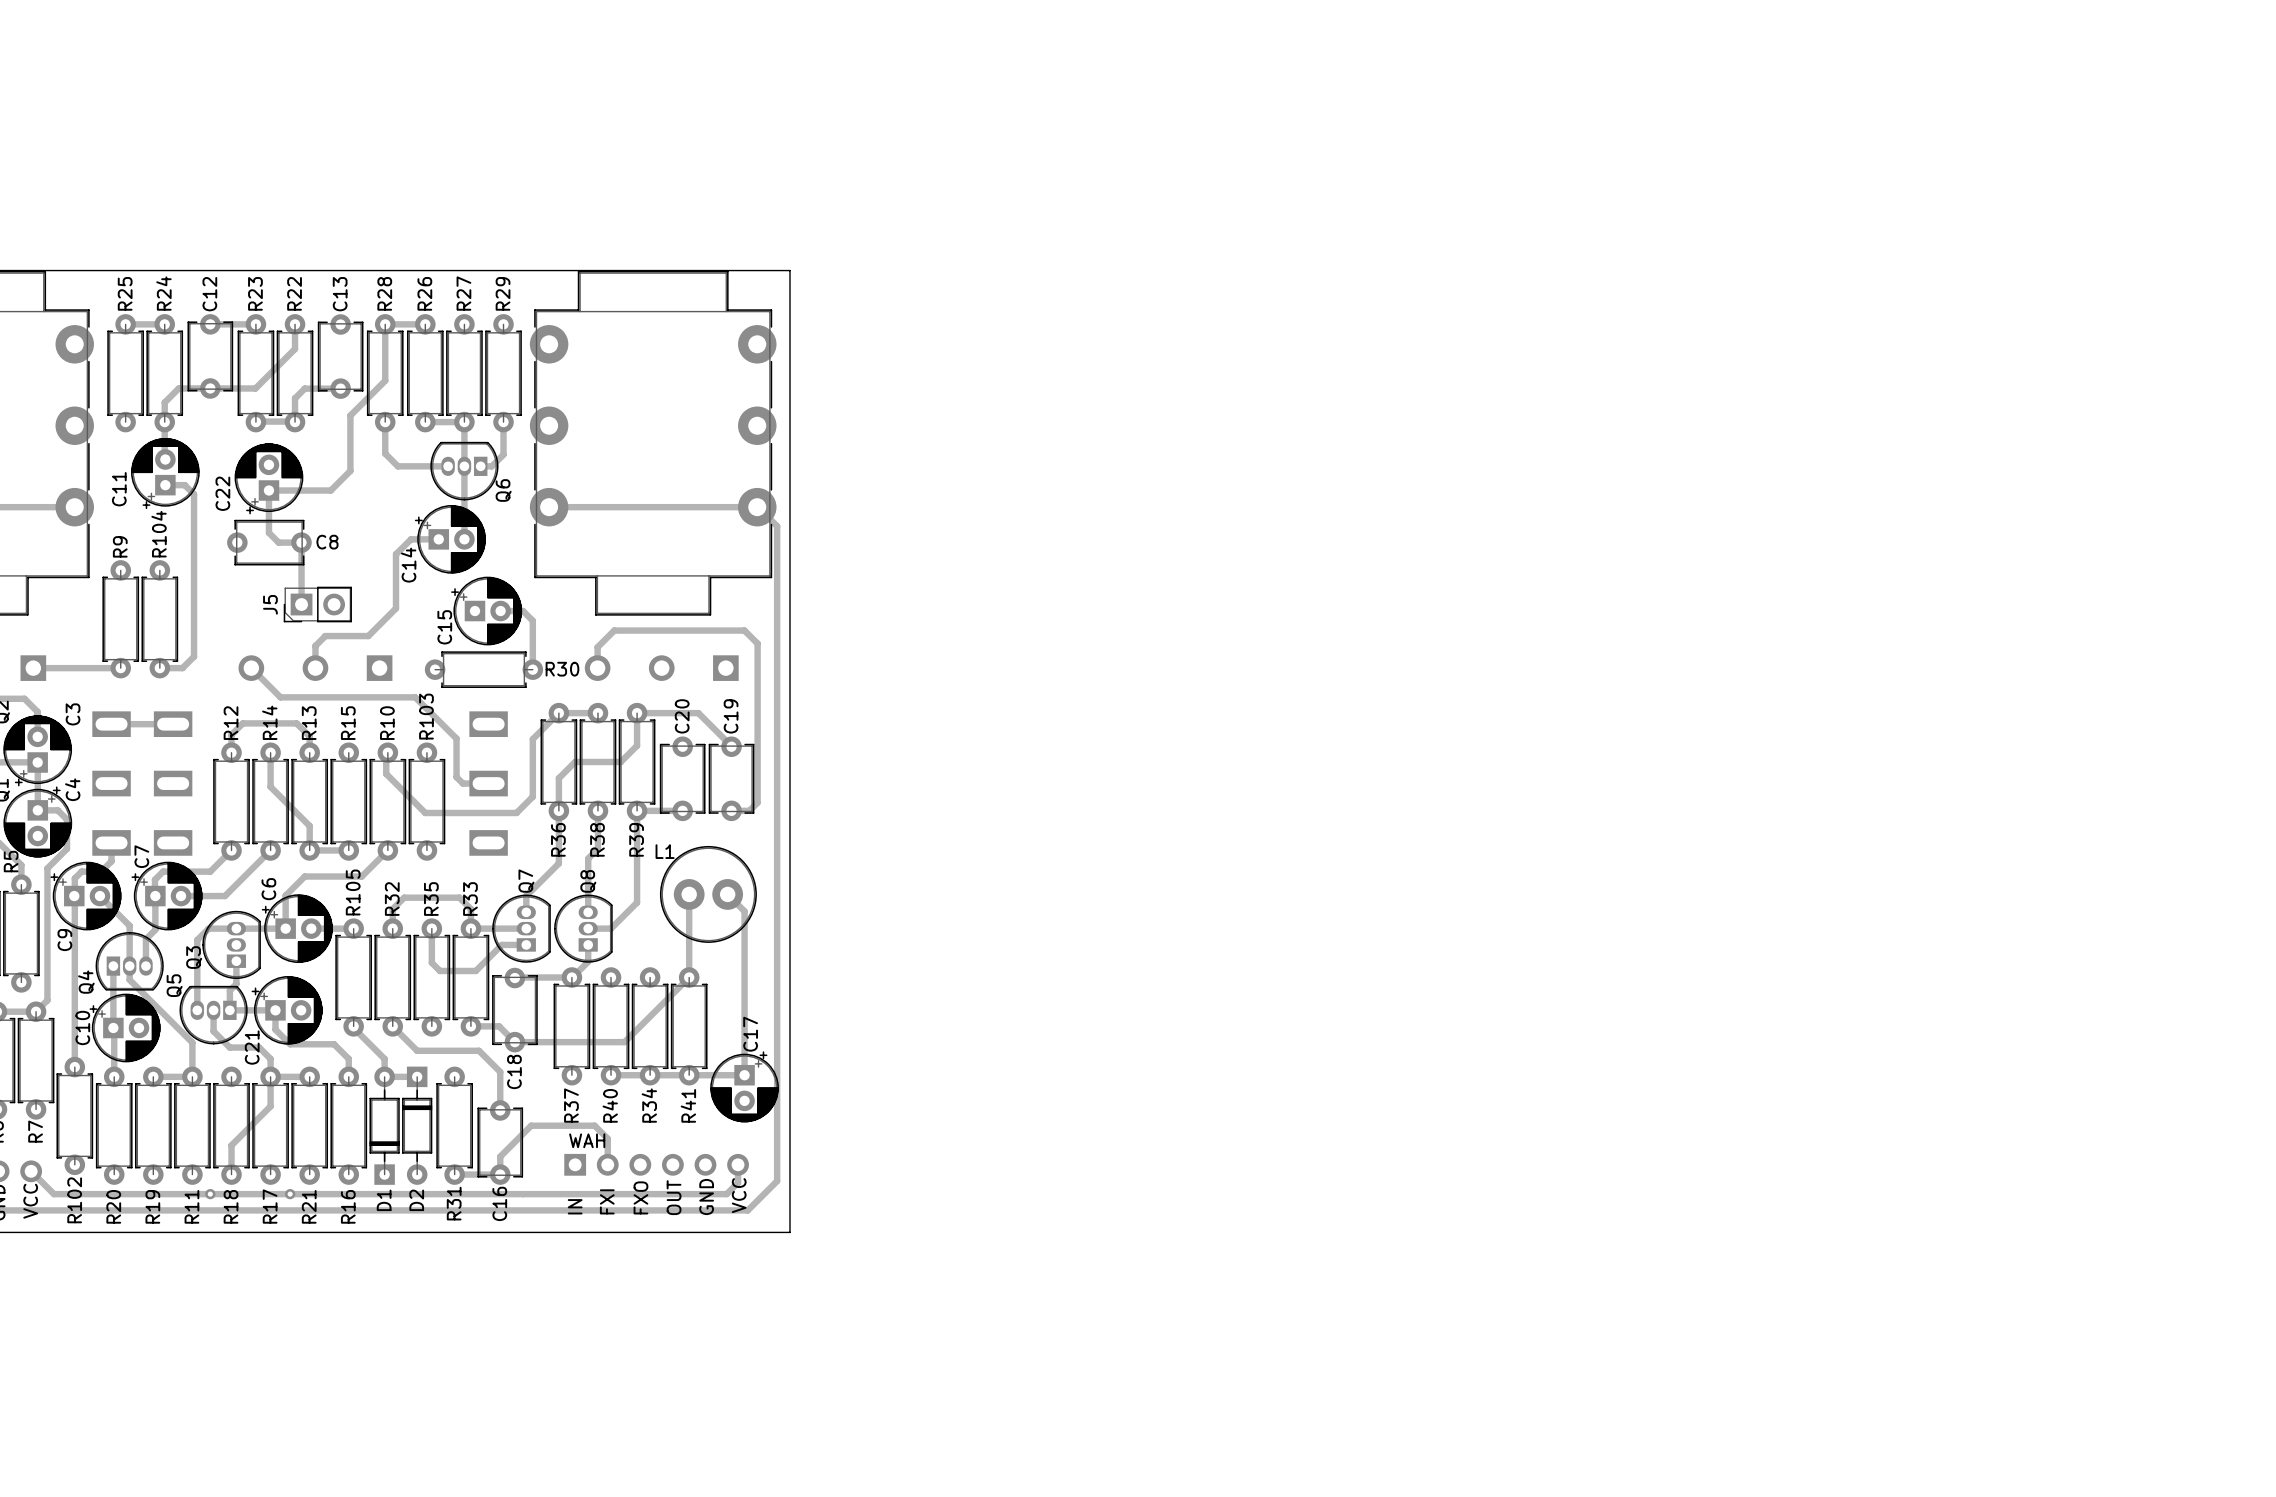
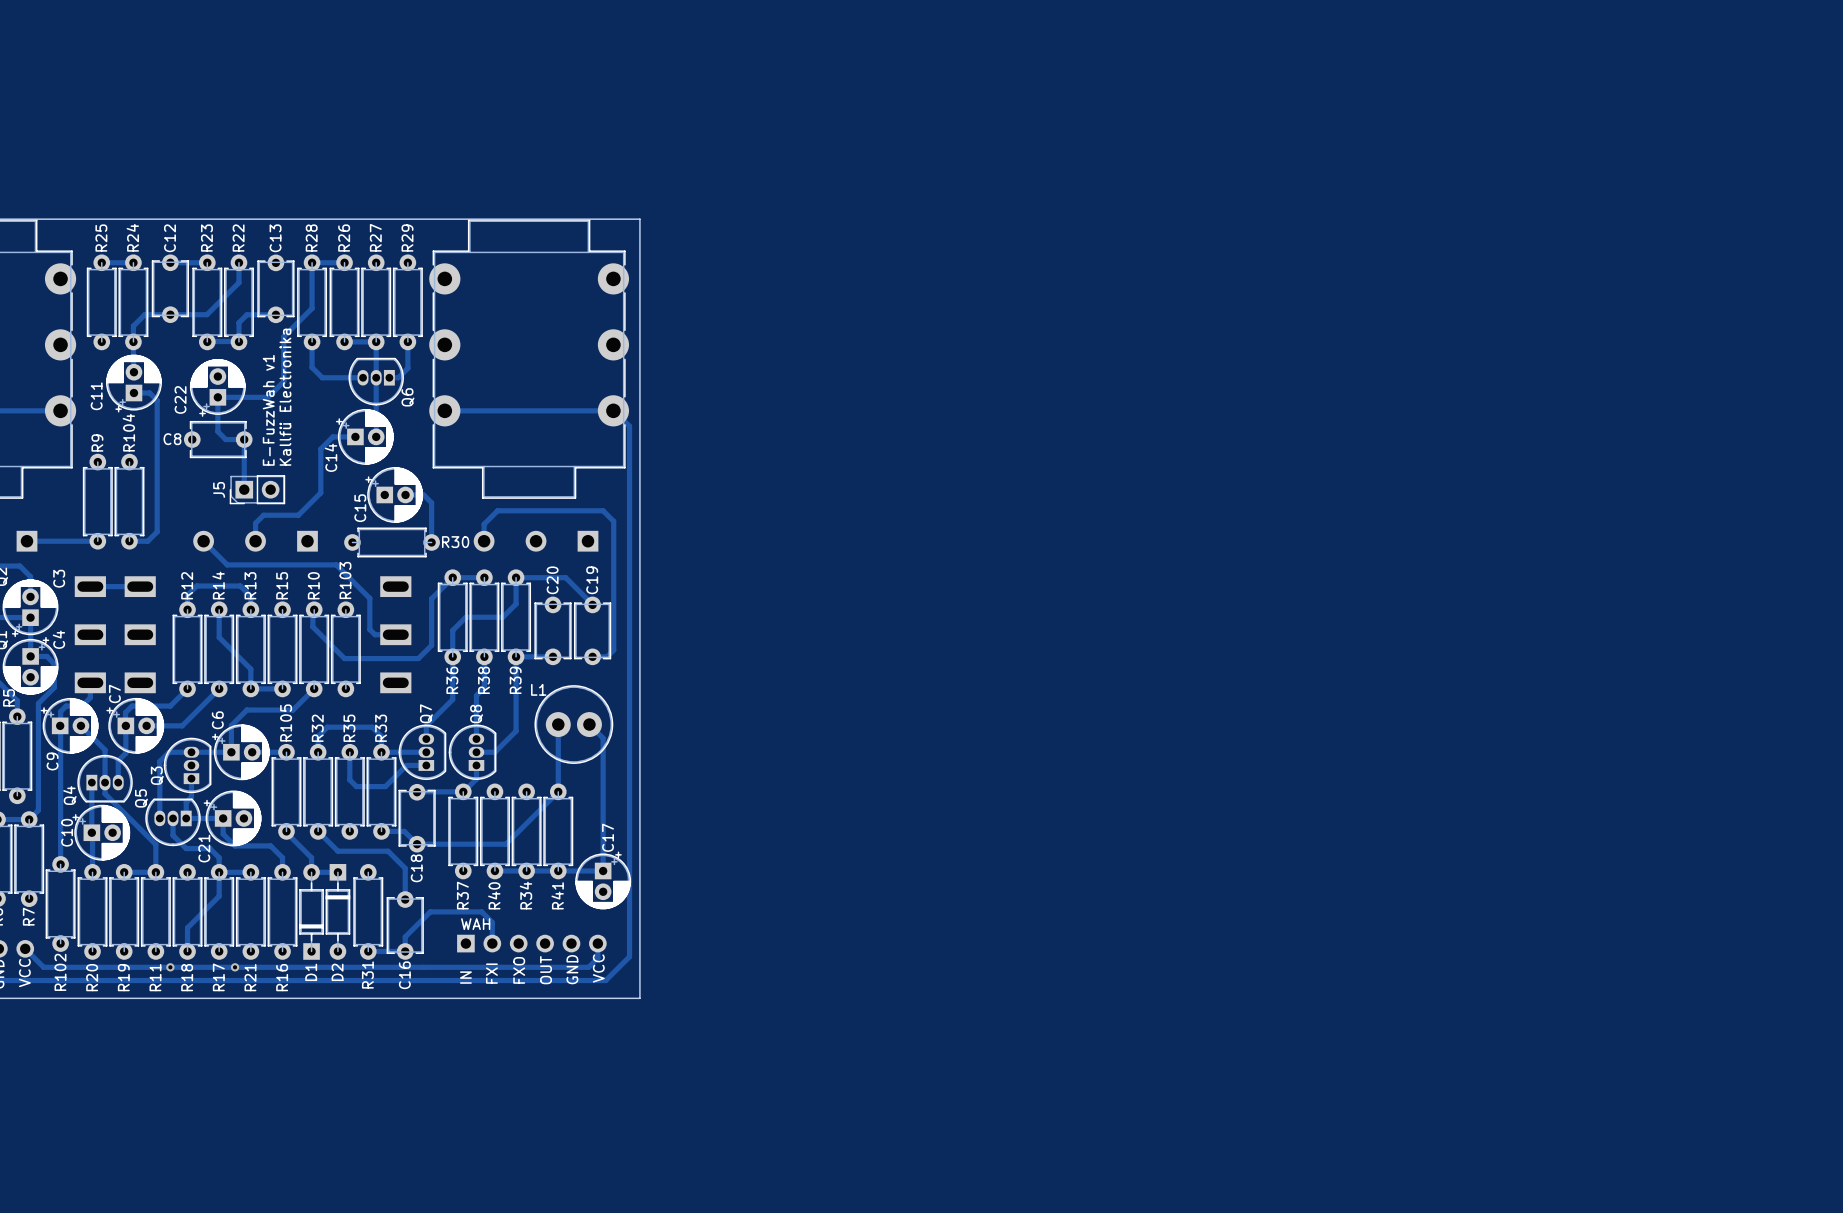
text: none -> Kallfü Electronika (285, 397)
text: none -> E-FuzzWah v1 (268, 410)
C8 name position: C8 (327, 542) -> C8 (172, 439)

